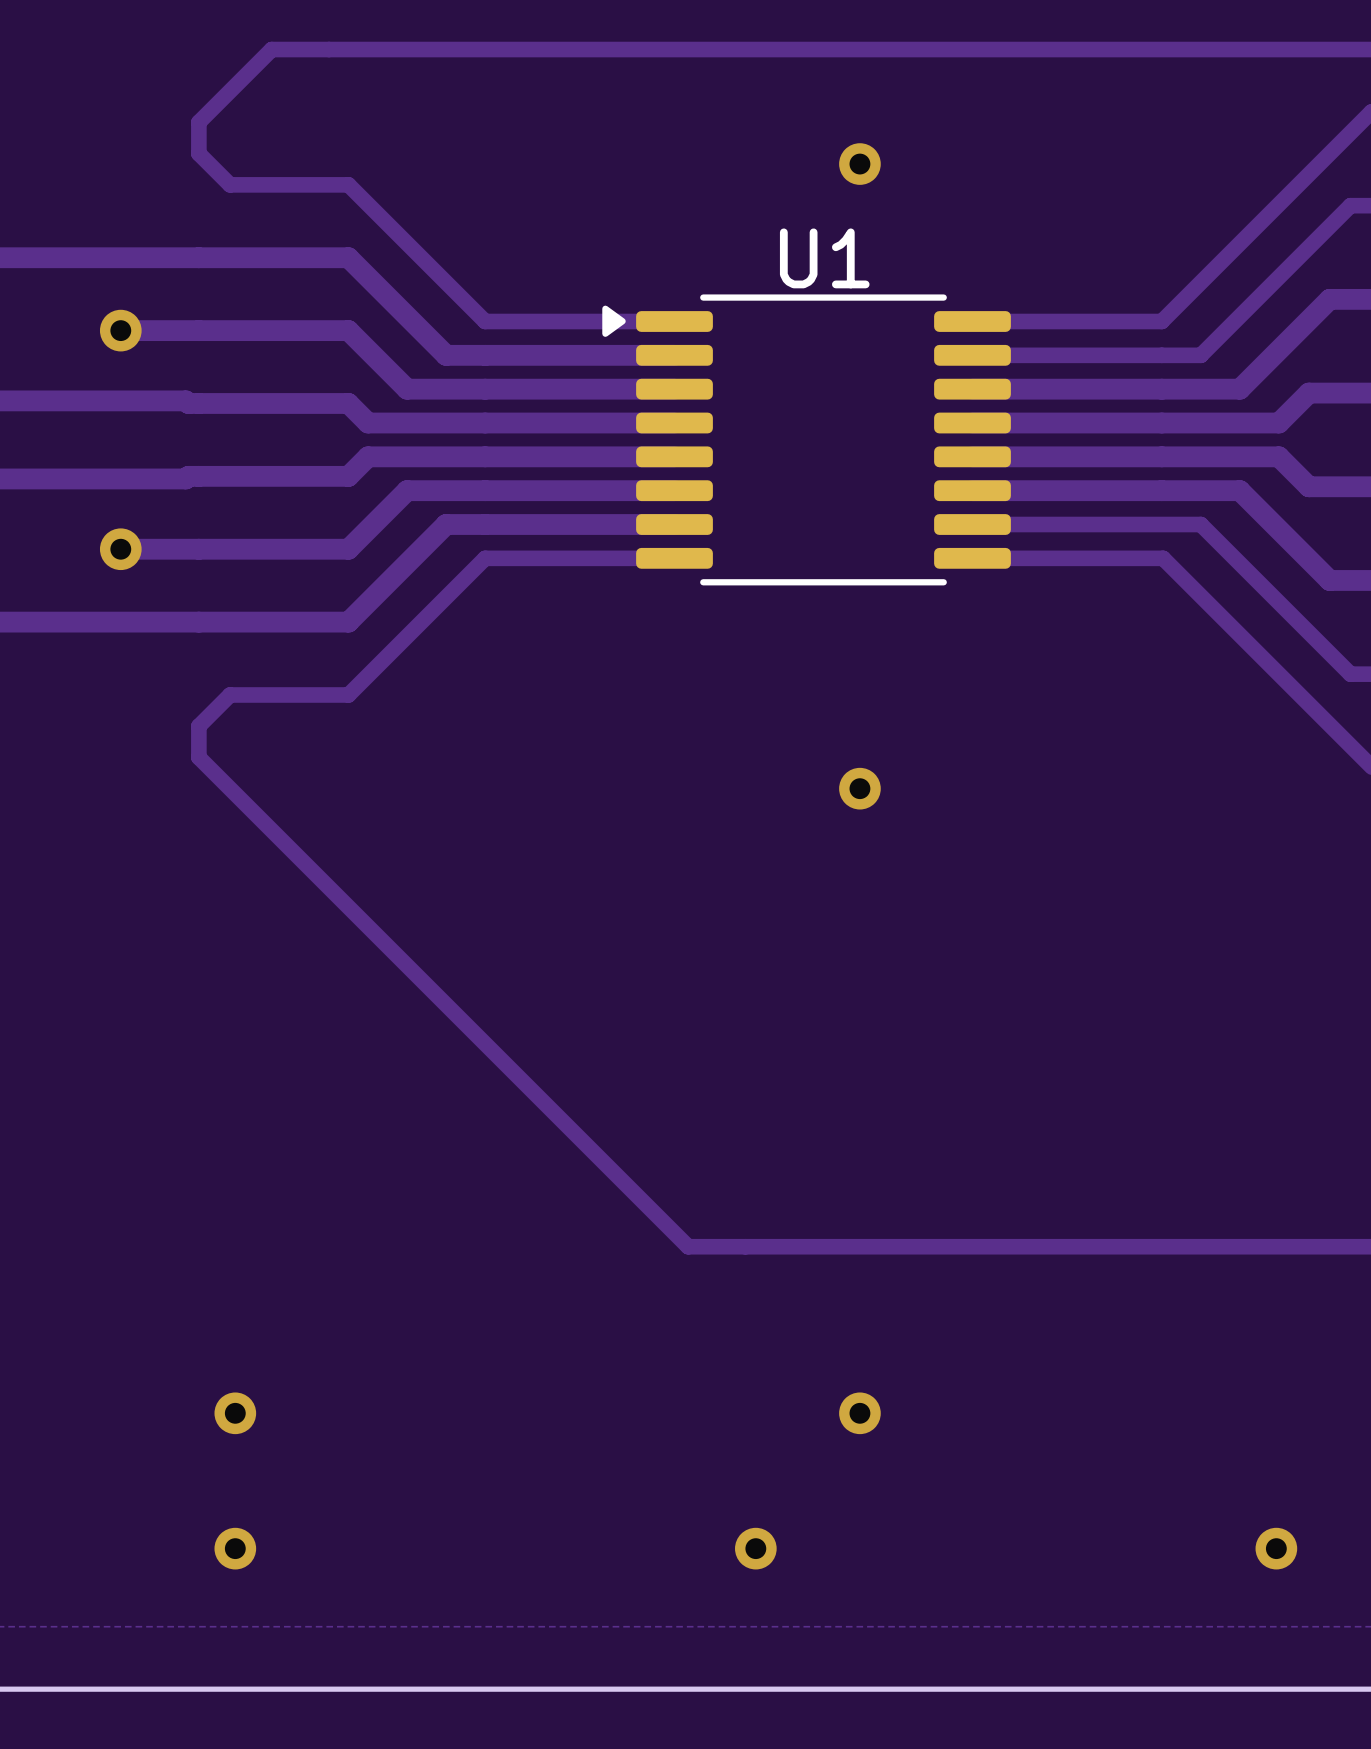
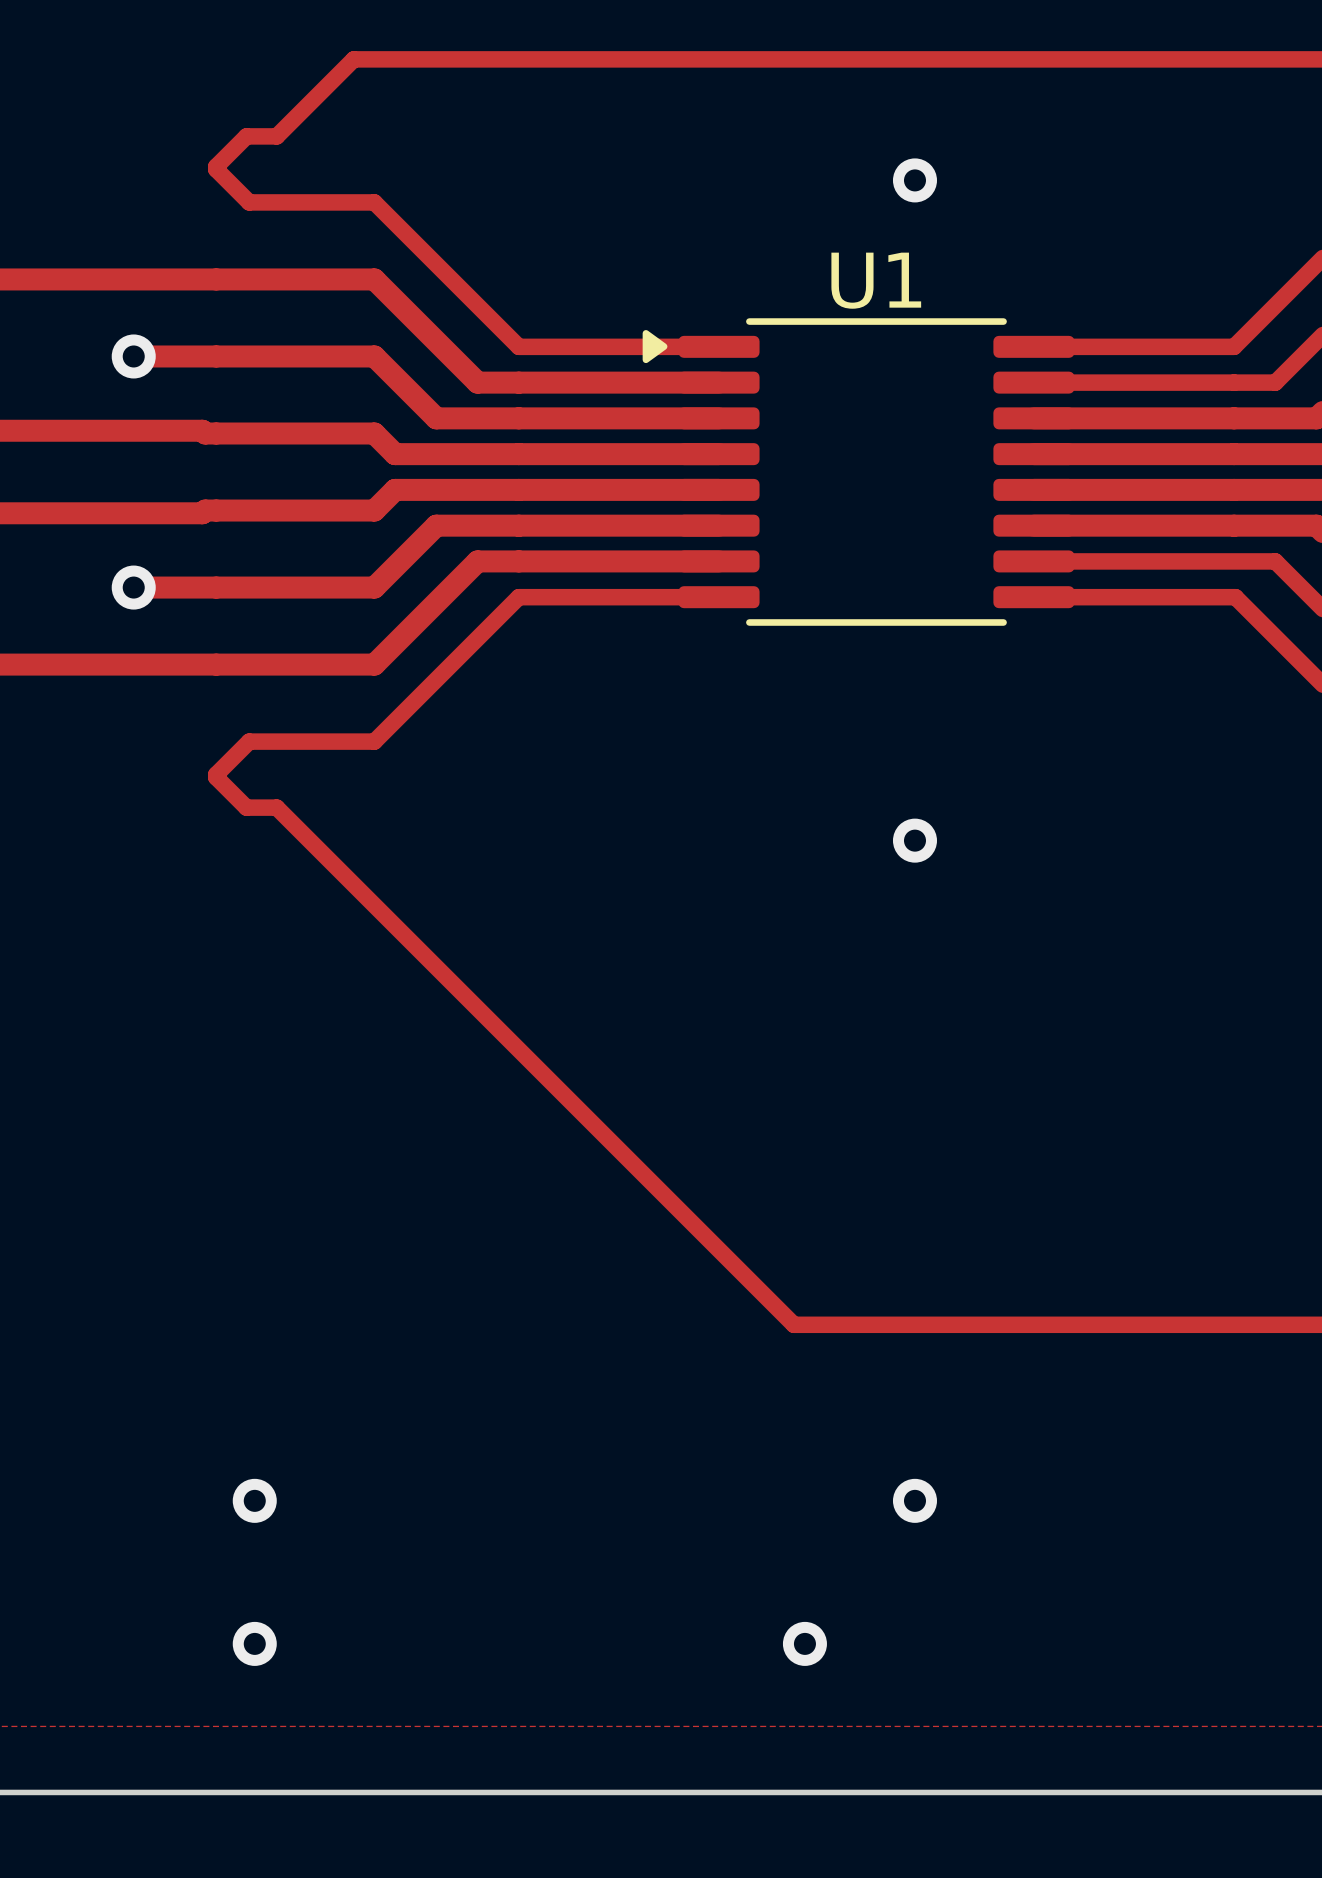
track: (329, 49) (271, 49) (198, 122) (198, 151) -> (353, 59) (276, 136) (246, 136) (216, 166)
track: (198, 728) (198, 757) (688, 1246) (745, 1246) -> (216, 777) (246, 807) (276, 807) (793, 1324)

